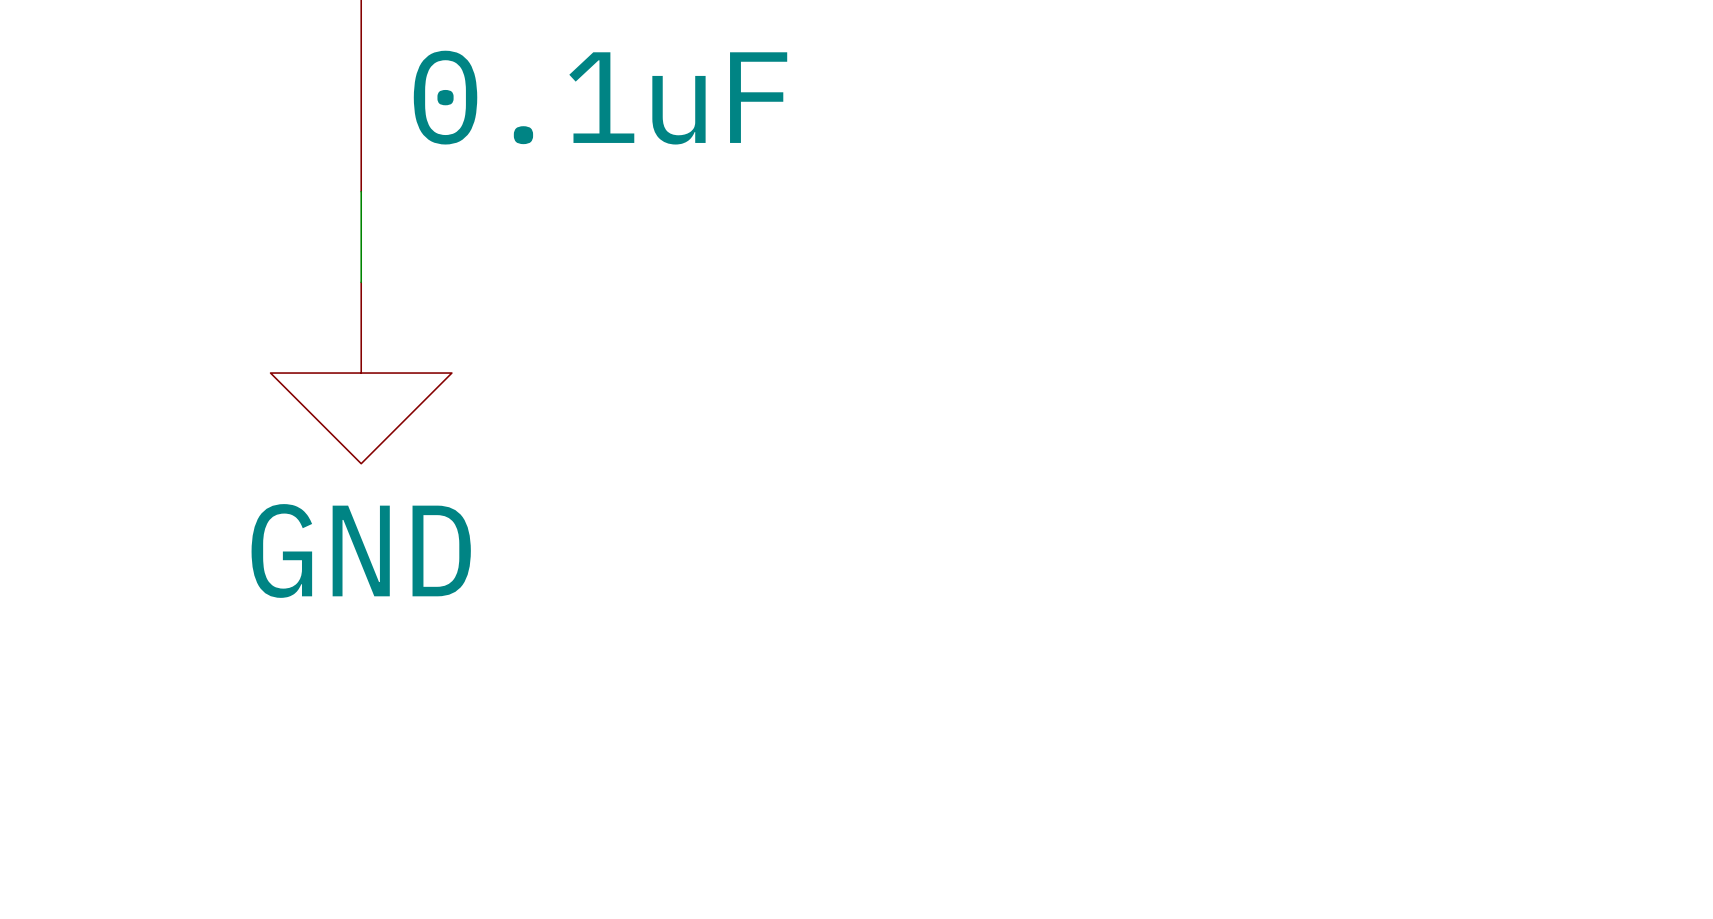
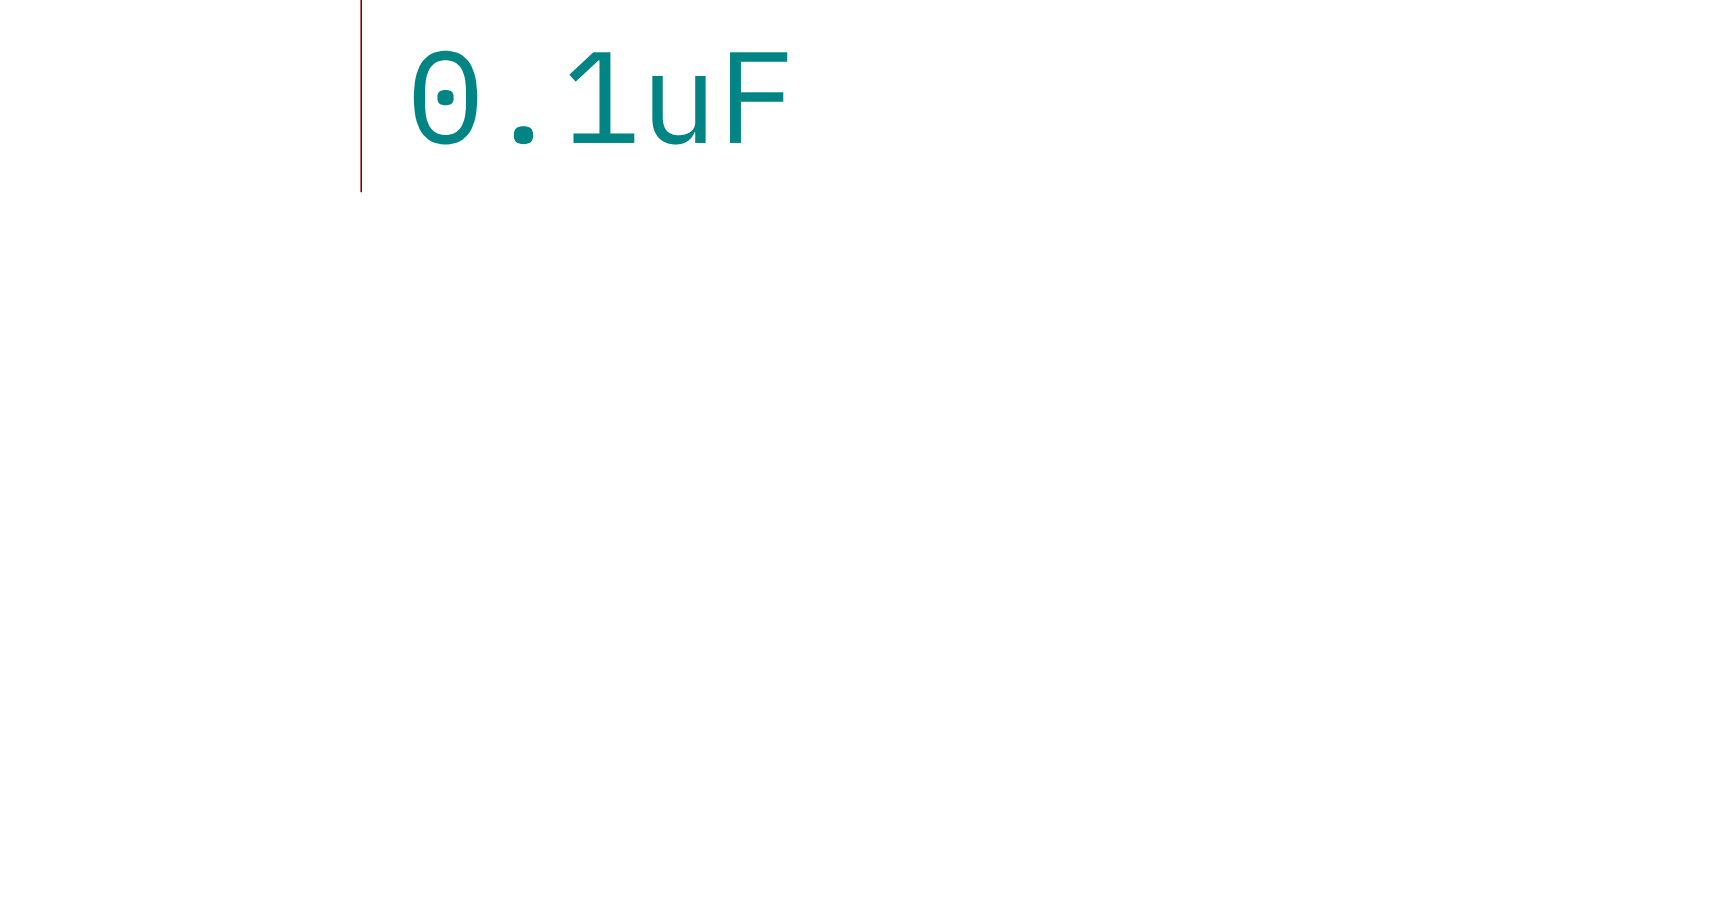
wire: (361, 191) (361, 282) -> none
power symbol: GND (361, 373) -> none

